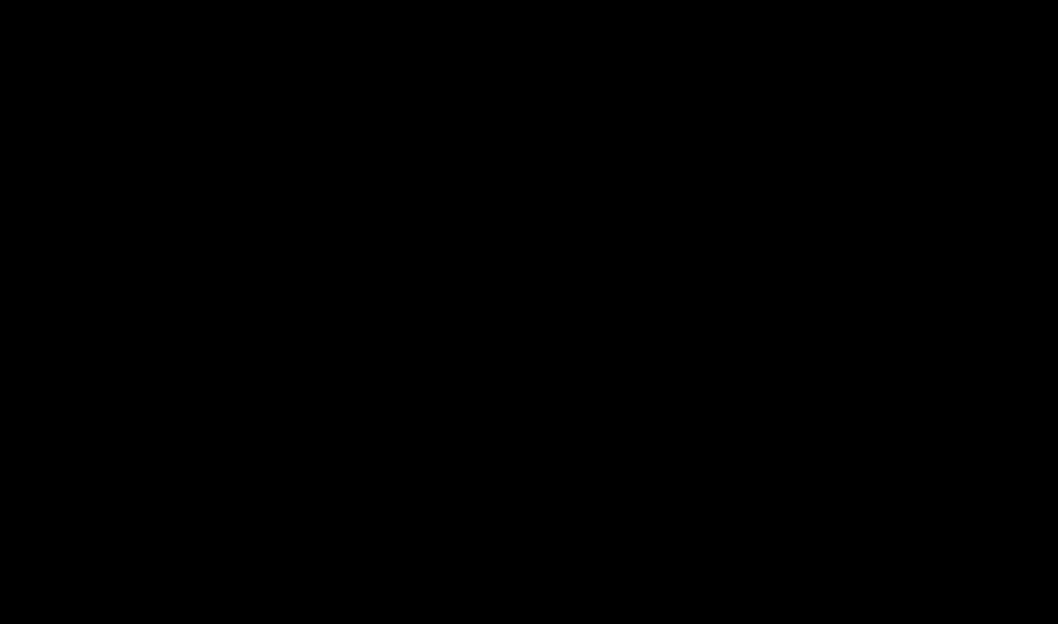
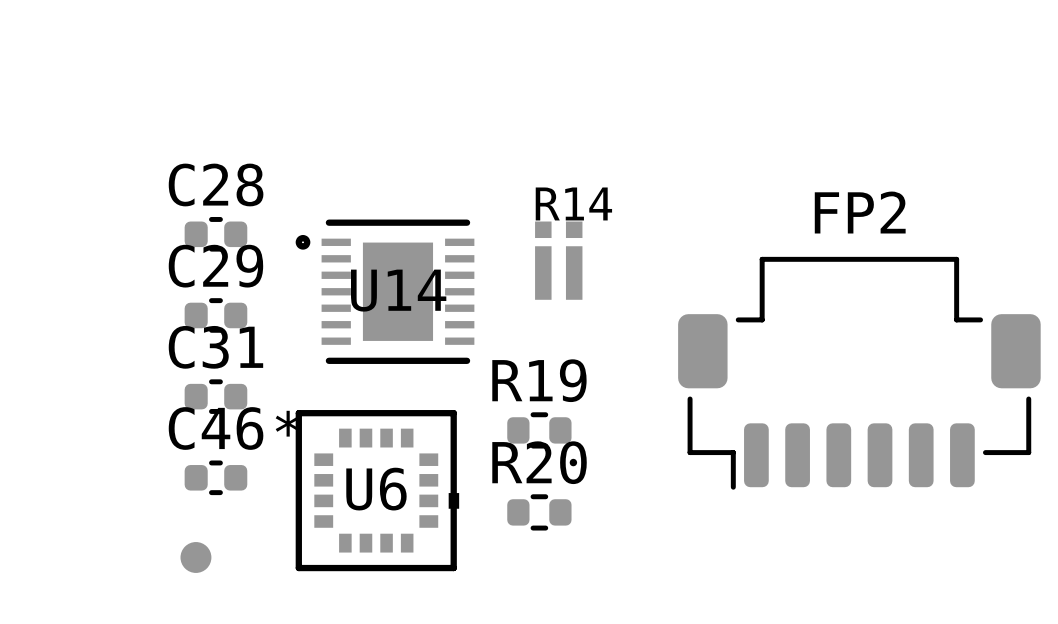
C28: none -> (215, 234)
R14: none -> (558, 260)
U14: none -> (385, 291)
C29: none -> (215, 315)
FP2: none -> (859, 373)
C31: none -> (215, 396)
R19: none -> (539, 430)
C46: none -> (215, 477)
U6: none -> (377, 490)
R20: none -> (539, 512)
part: none -> (195, 557)

